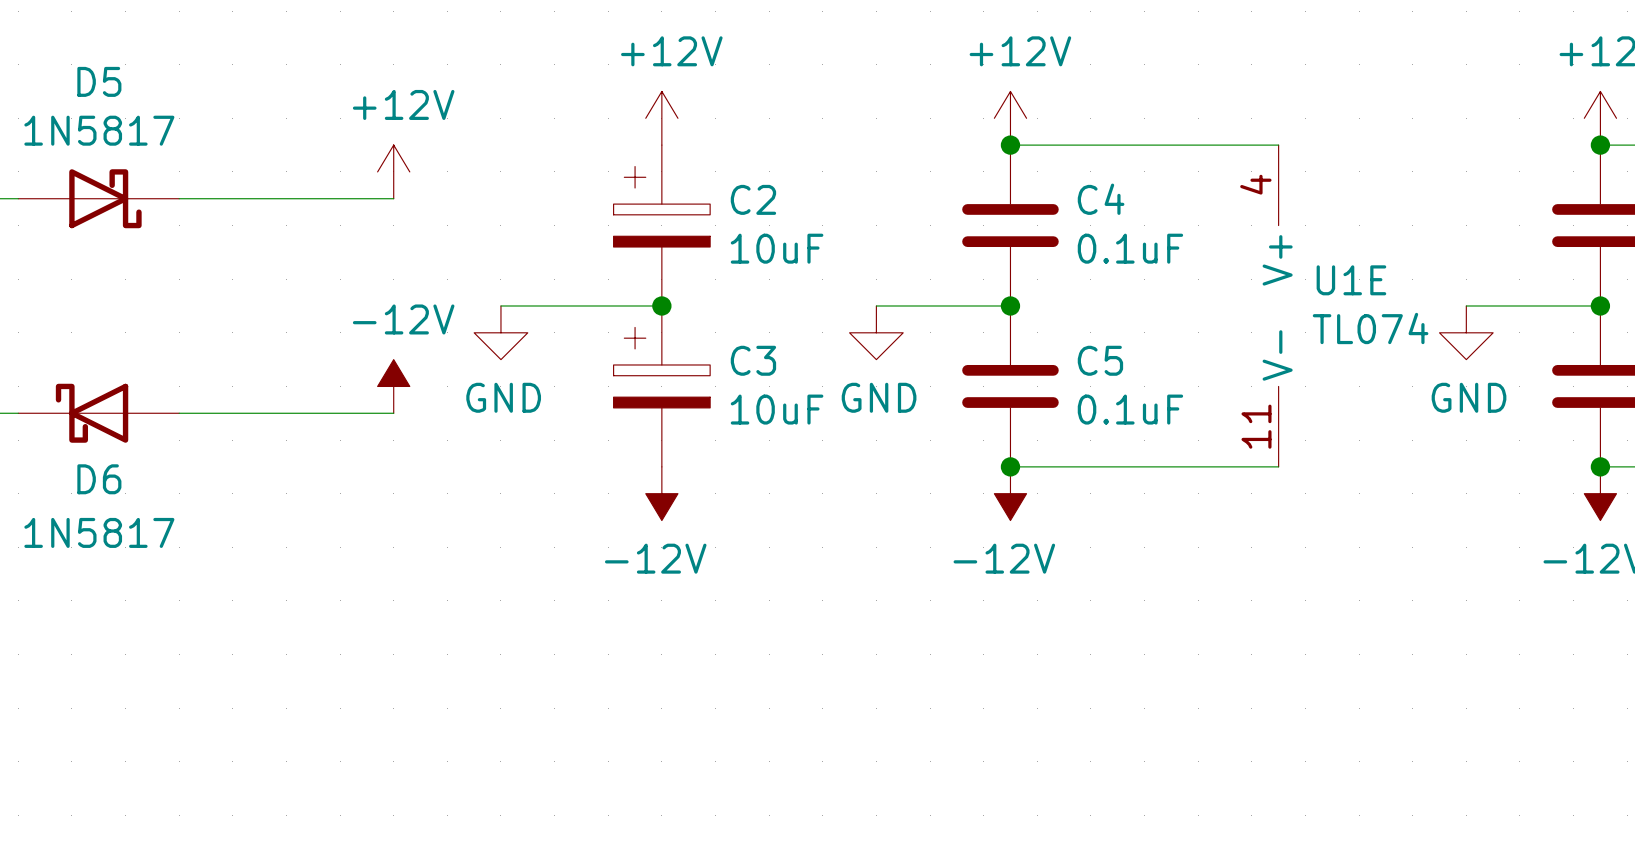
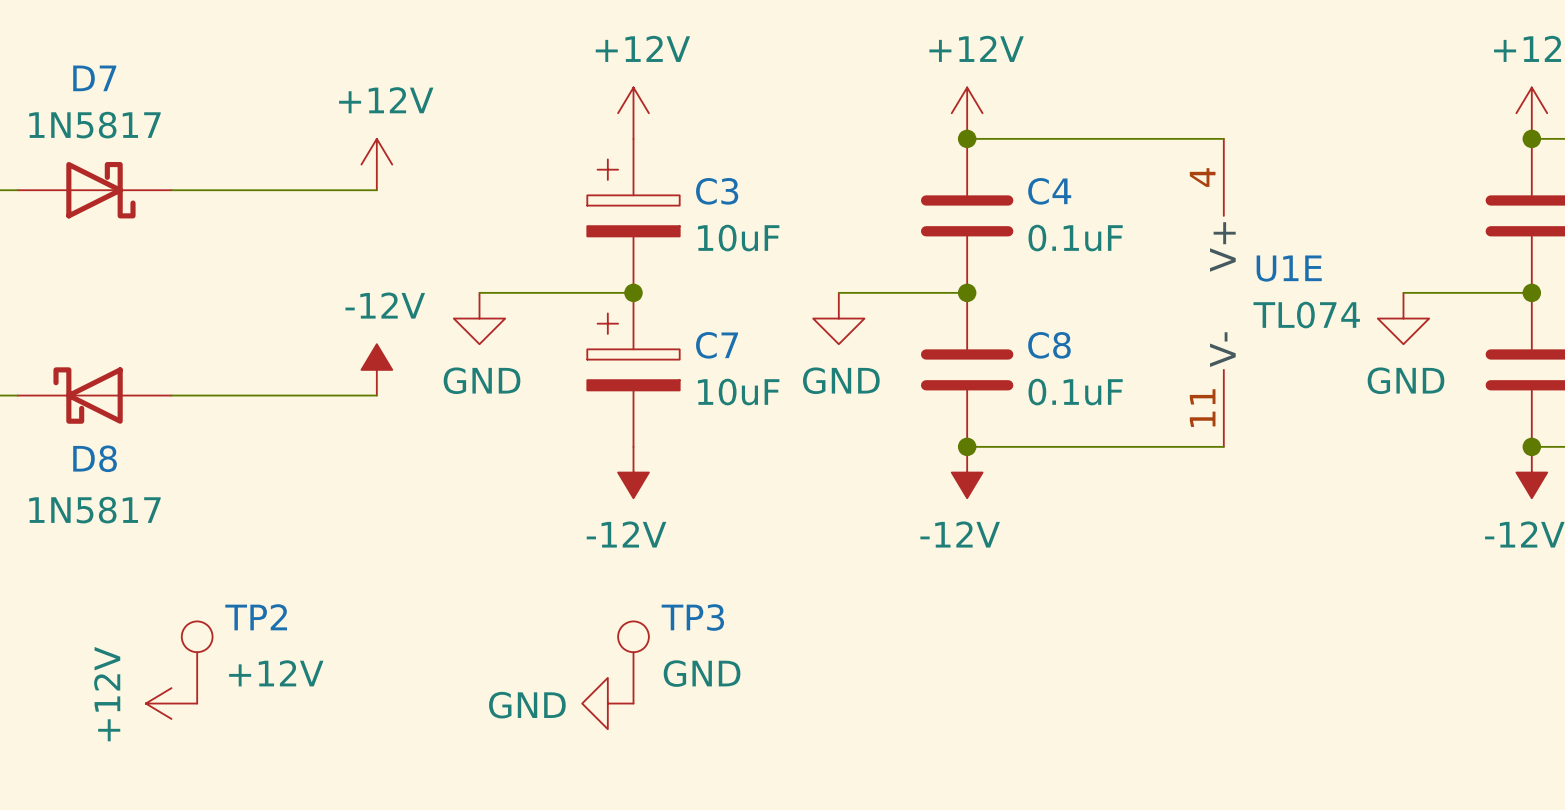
D5 name: D5 (99, 81) -> D7 (94, 78)
C2 name: C2 (753, 199) -> C3 (717, 191)
C3 name: C3 (753, 360) -> C7 (717, 345)
C5 name: C5 (1100, 360) -> C8 (1049, 345)
D6 name: D6 (99, 479) -> D8 (95, 458)
TP2: none -> +12V (197, 662)
TP3: none -> GND (633, 662)
power symbol: none -> +12V (171, 703)
power symbol: none -> GND (607, 703)

